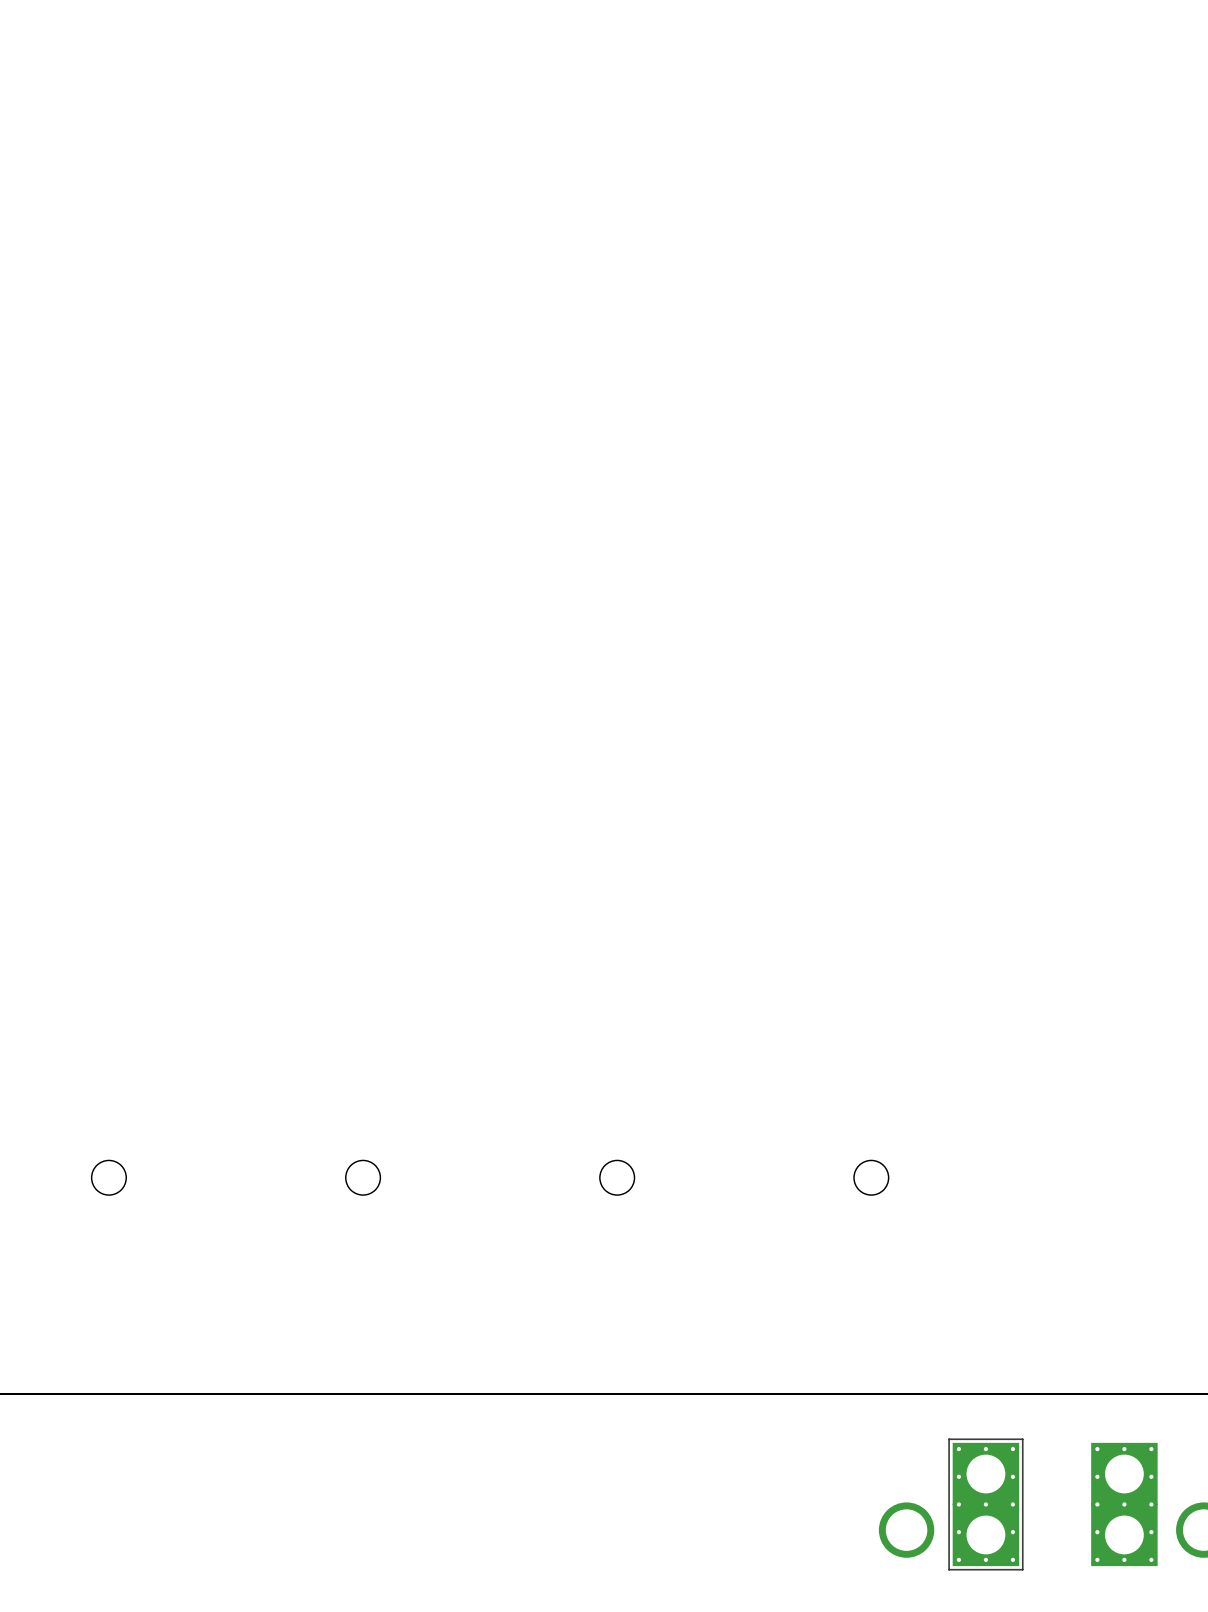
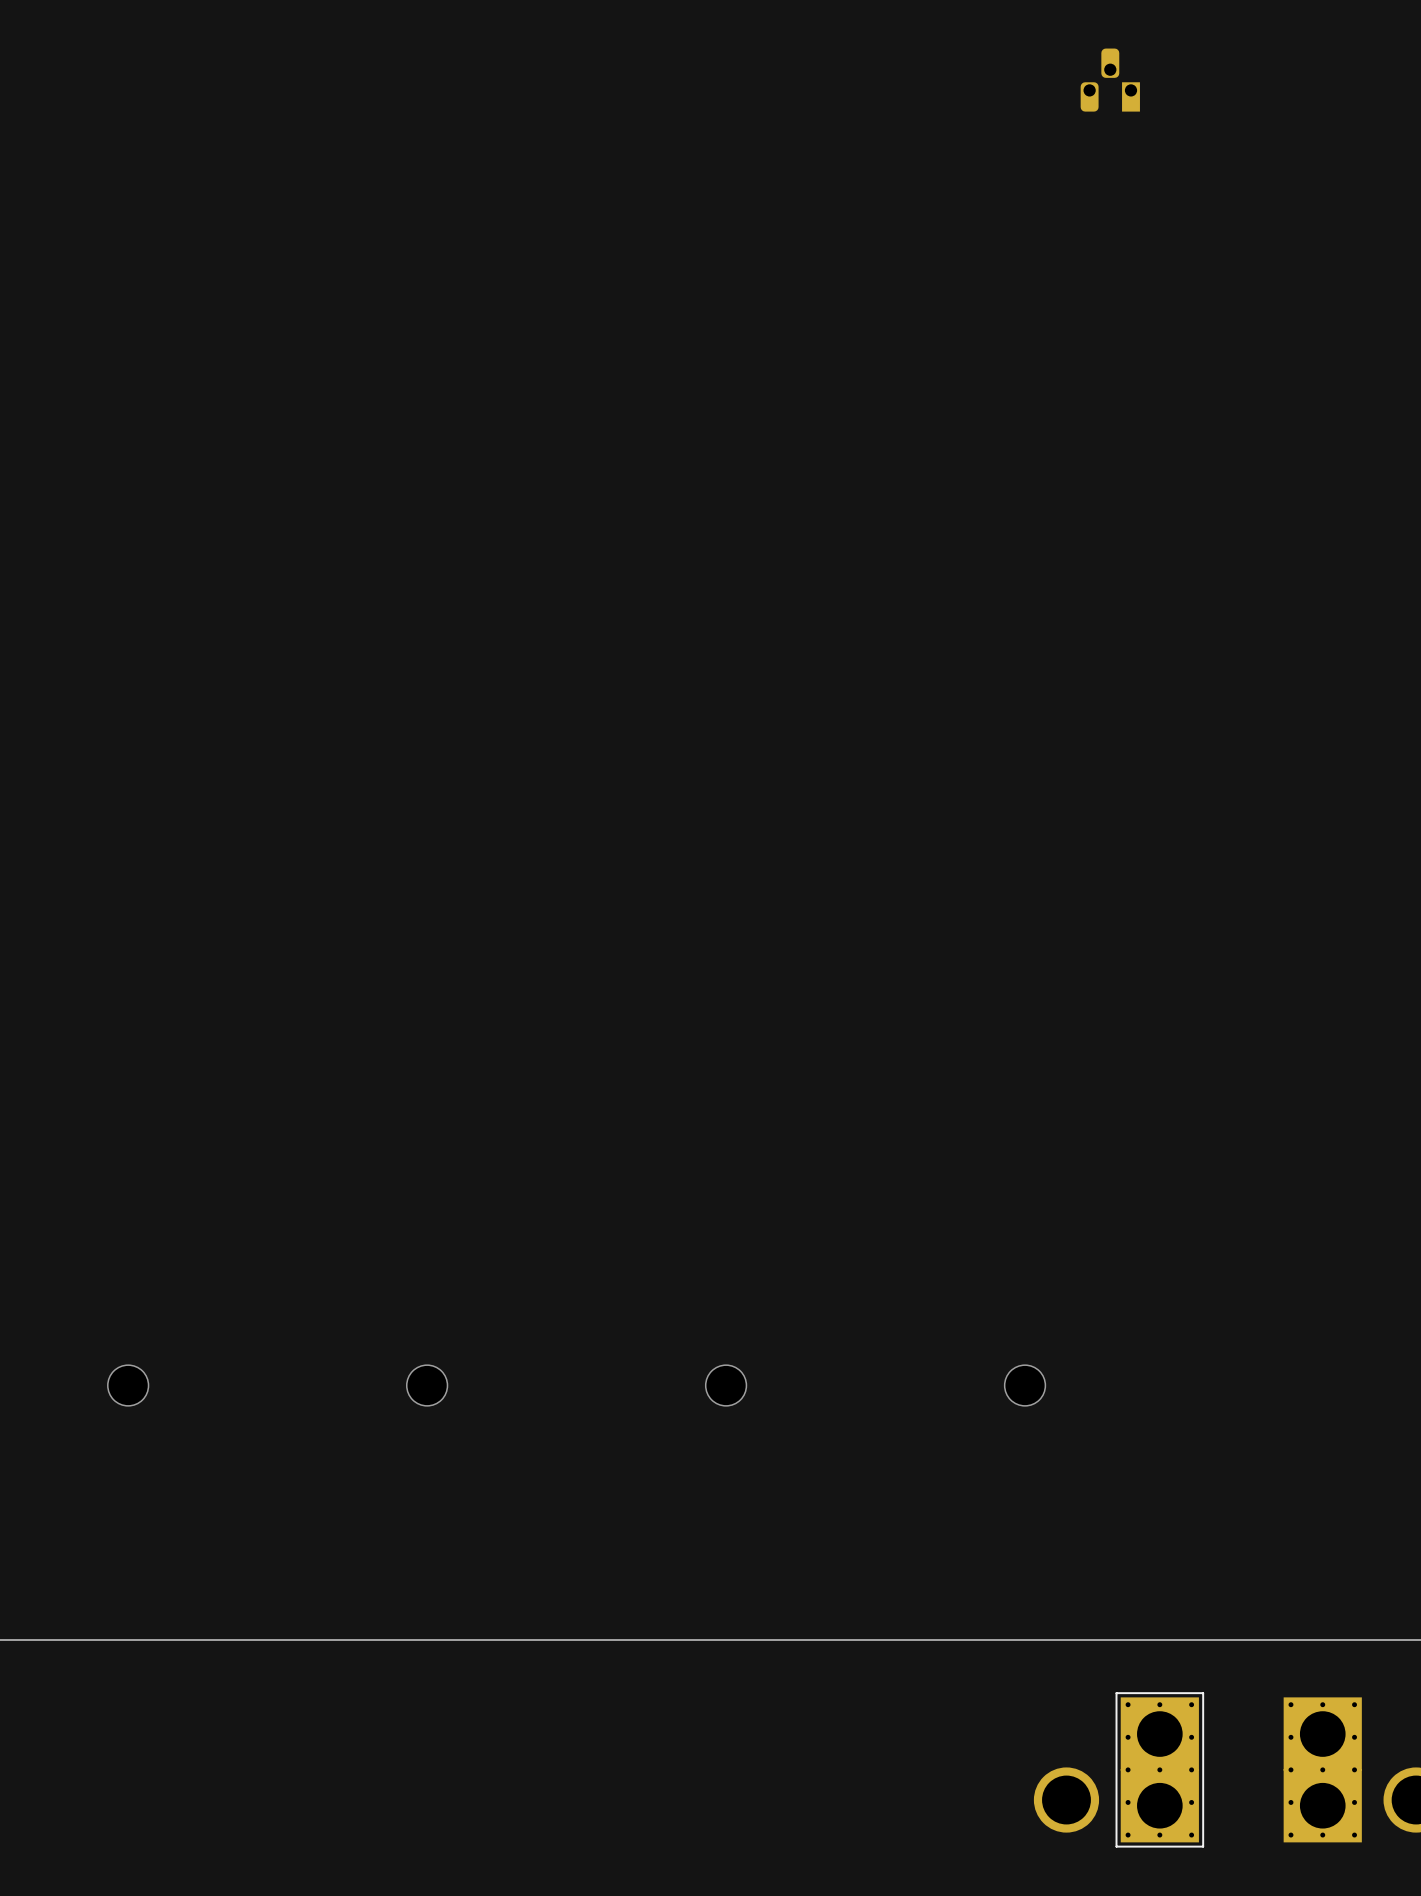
part: none -> (1110, 80)

